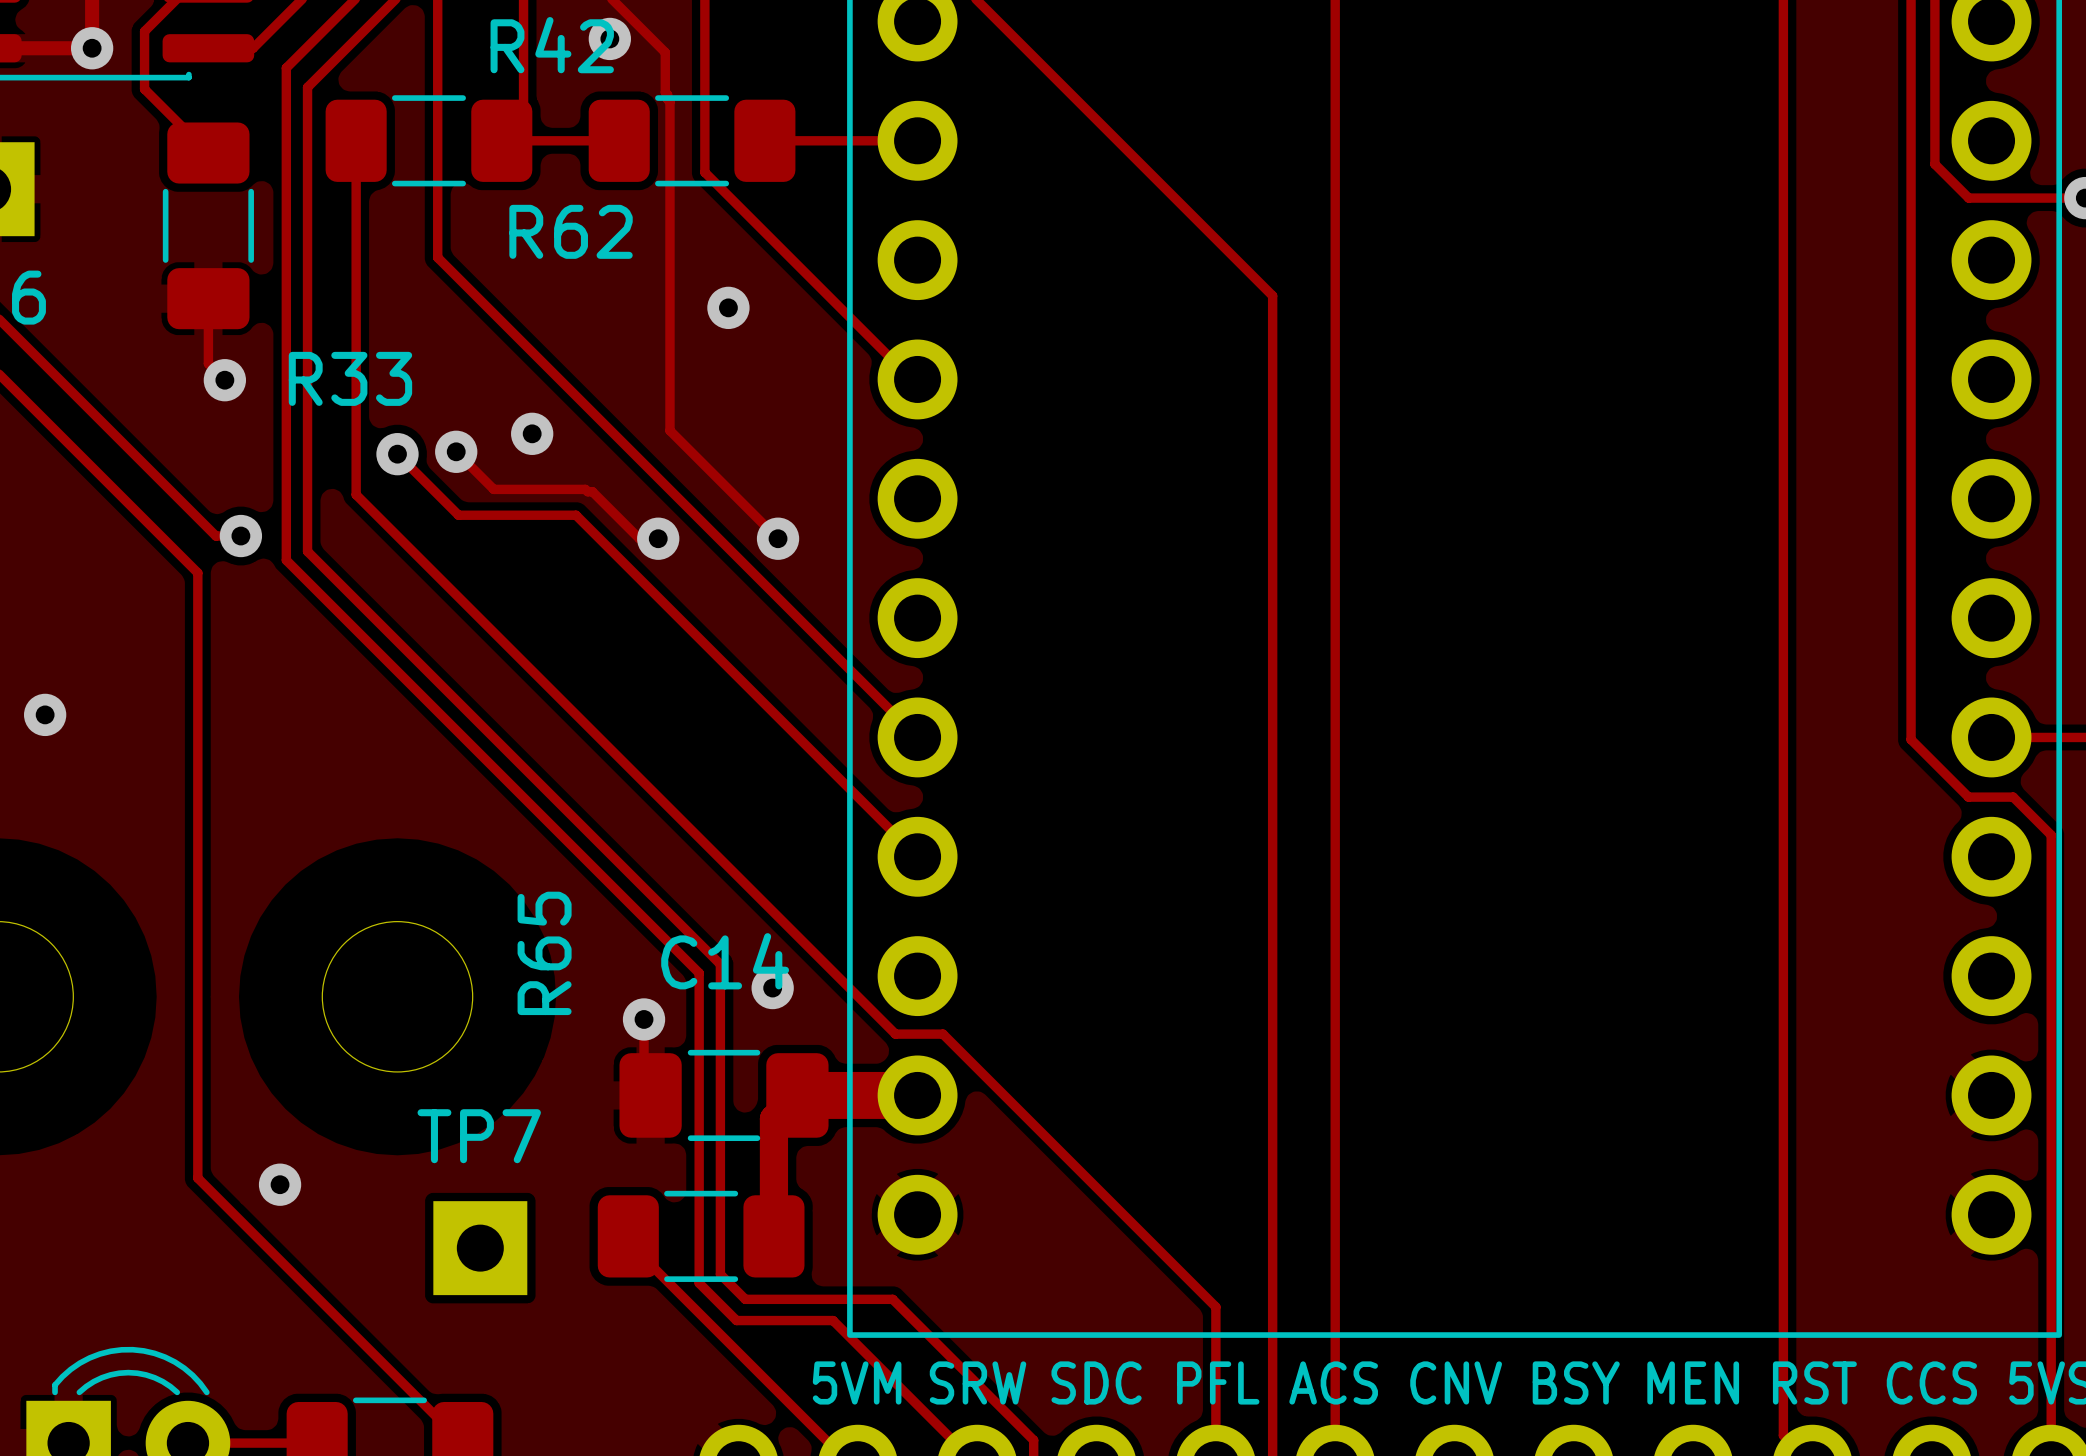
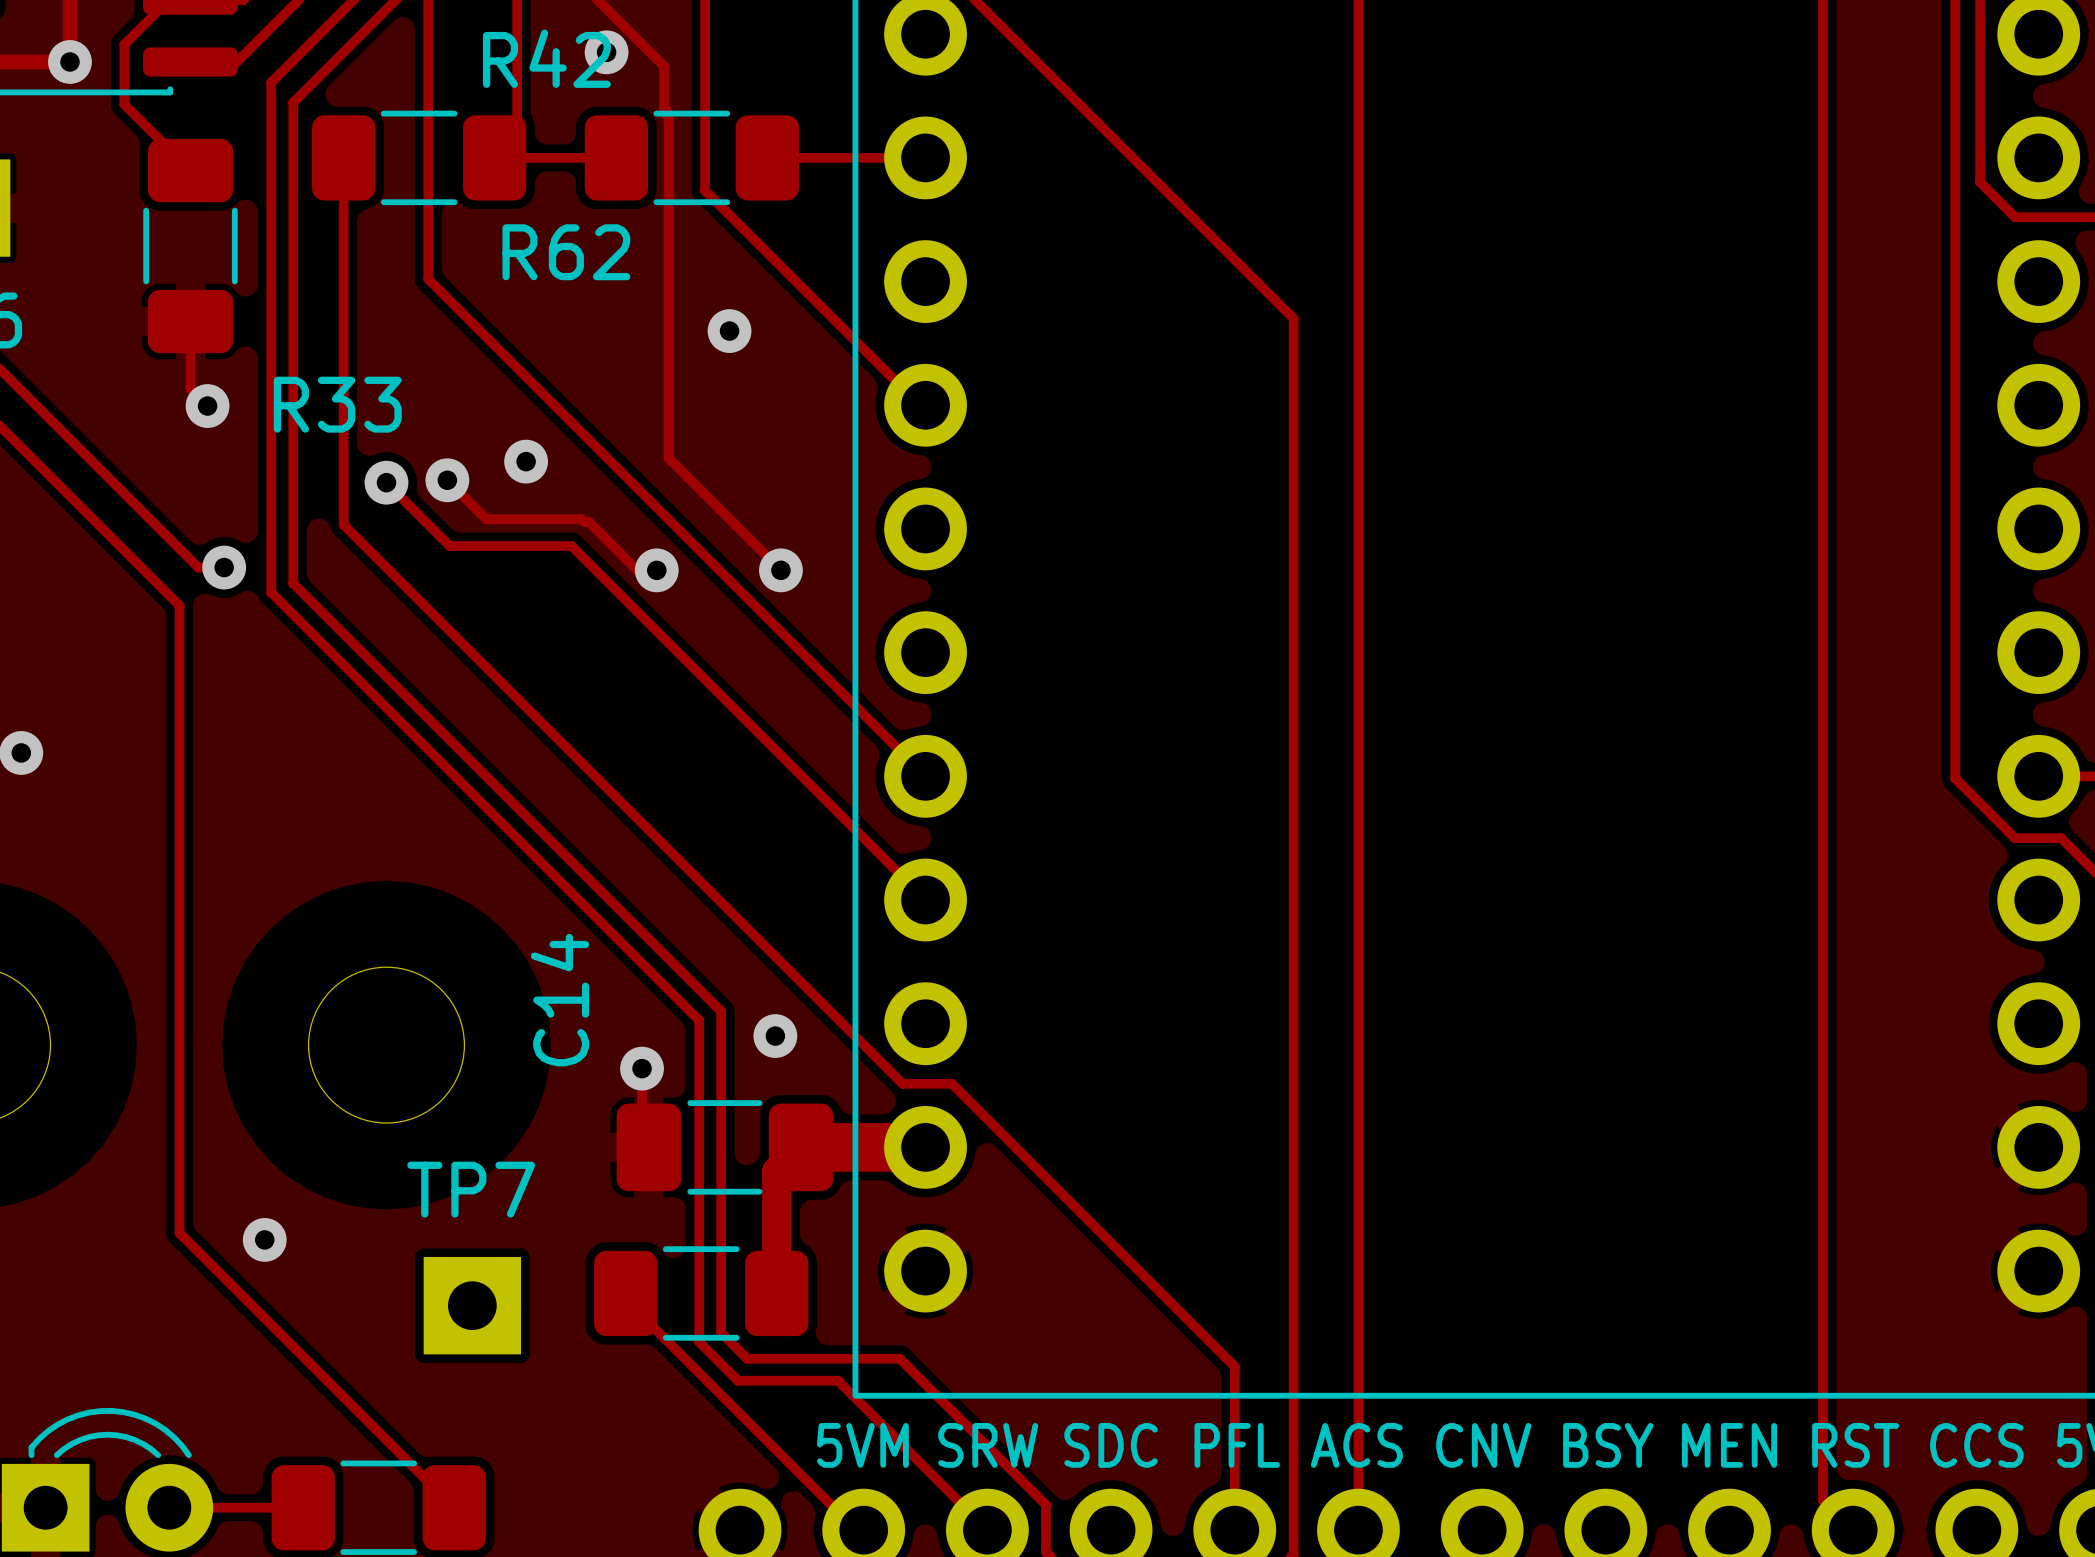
R65 name: R65 (544, 953) -> none
C14 name rotation: 0° (725, 961) -> 90° counterclockwise (560, 1000)

